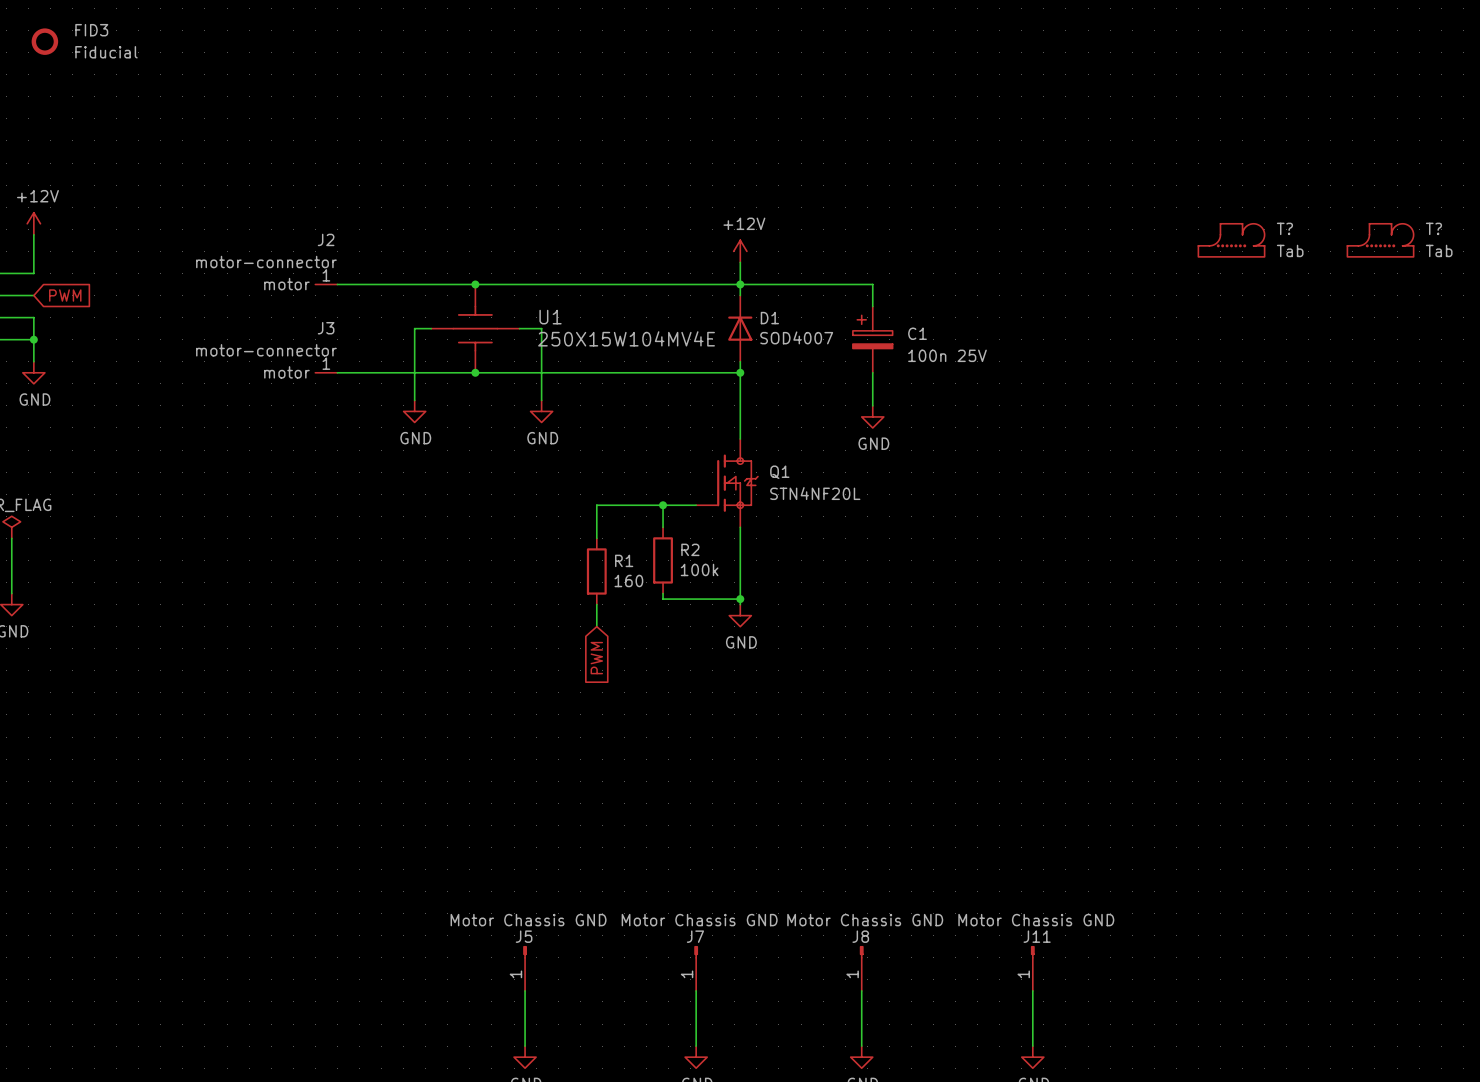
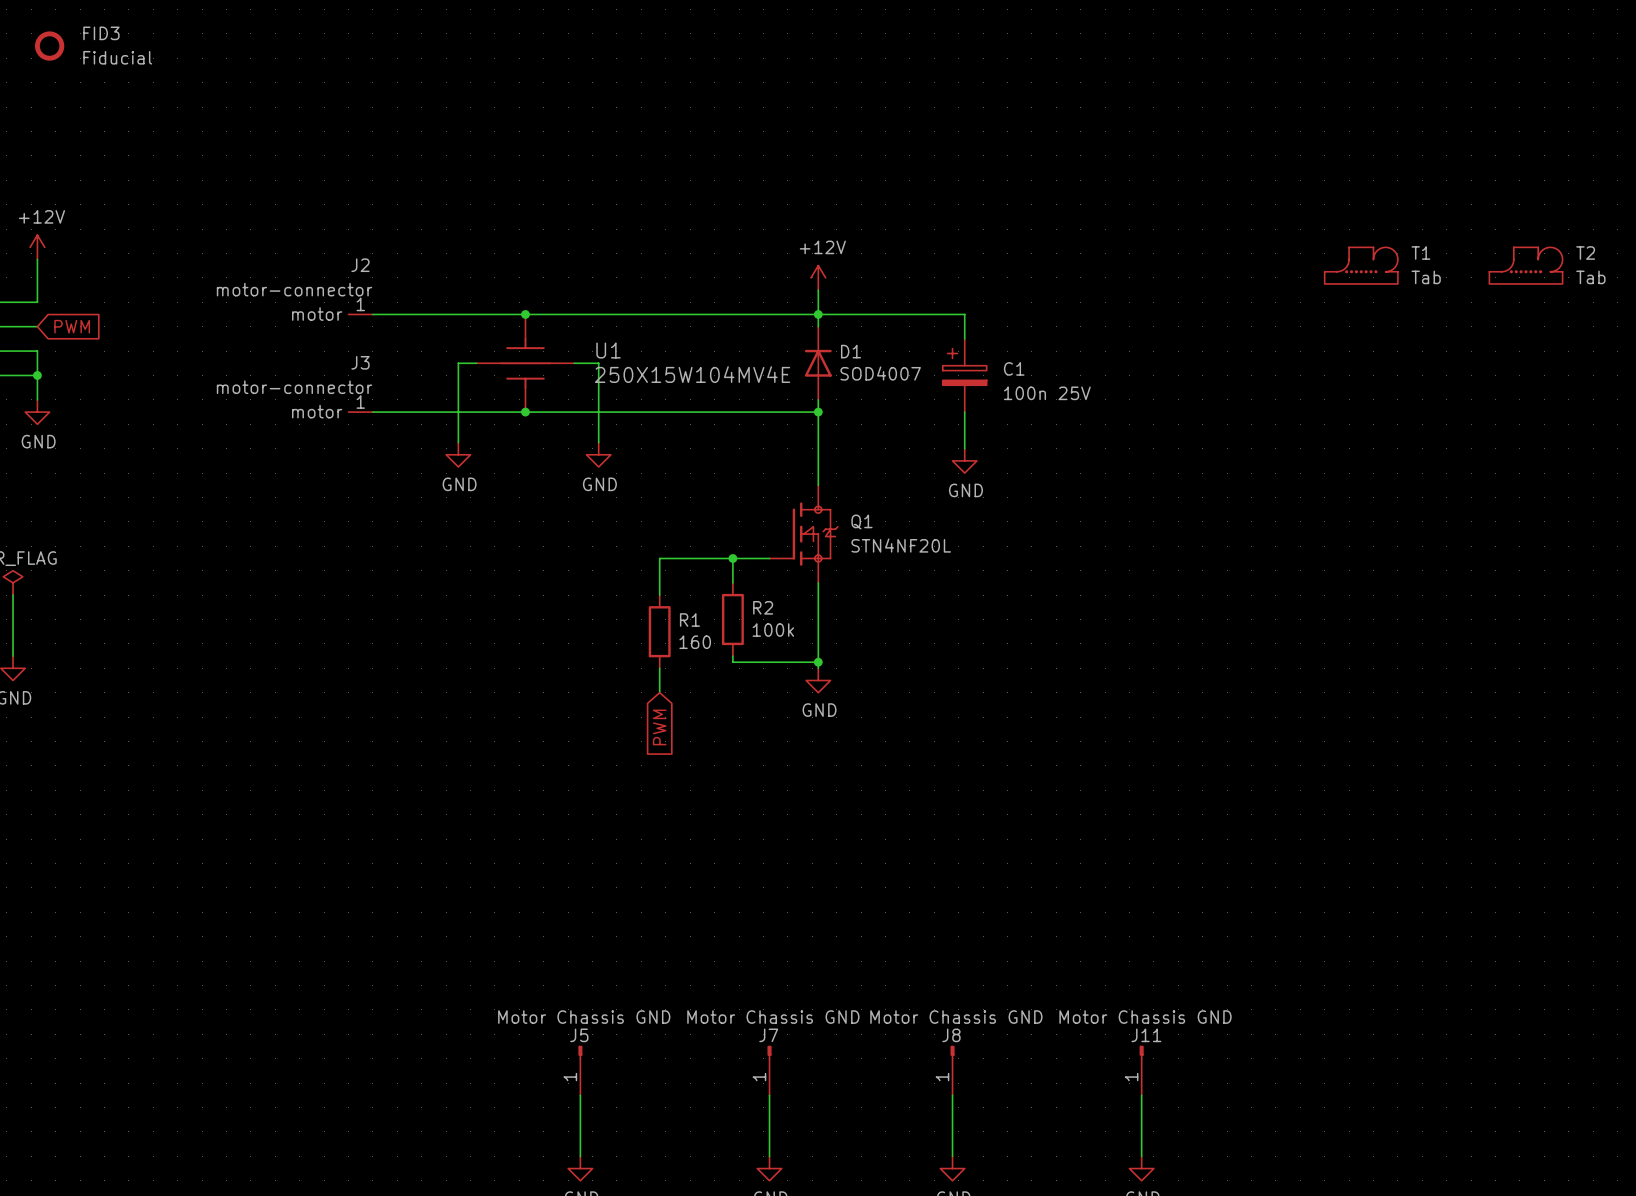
T? name: T? (1284, 228) -> T1 (1420, 253)
T? name: T? (1433, 228) -> T2 (1585, 253)

